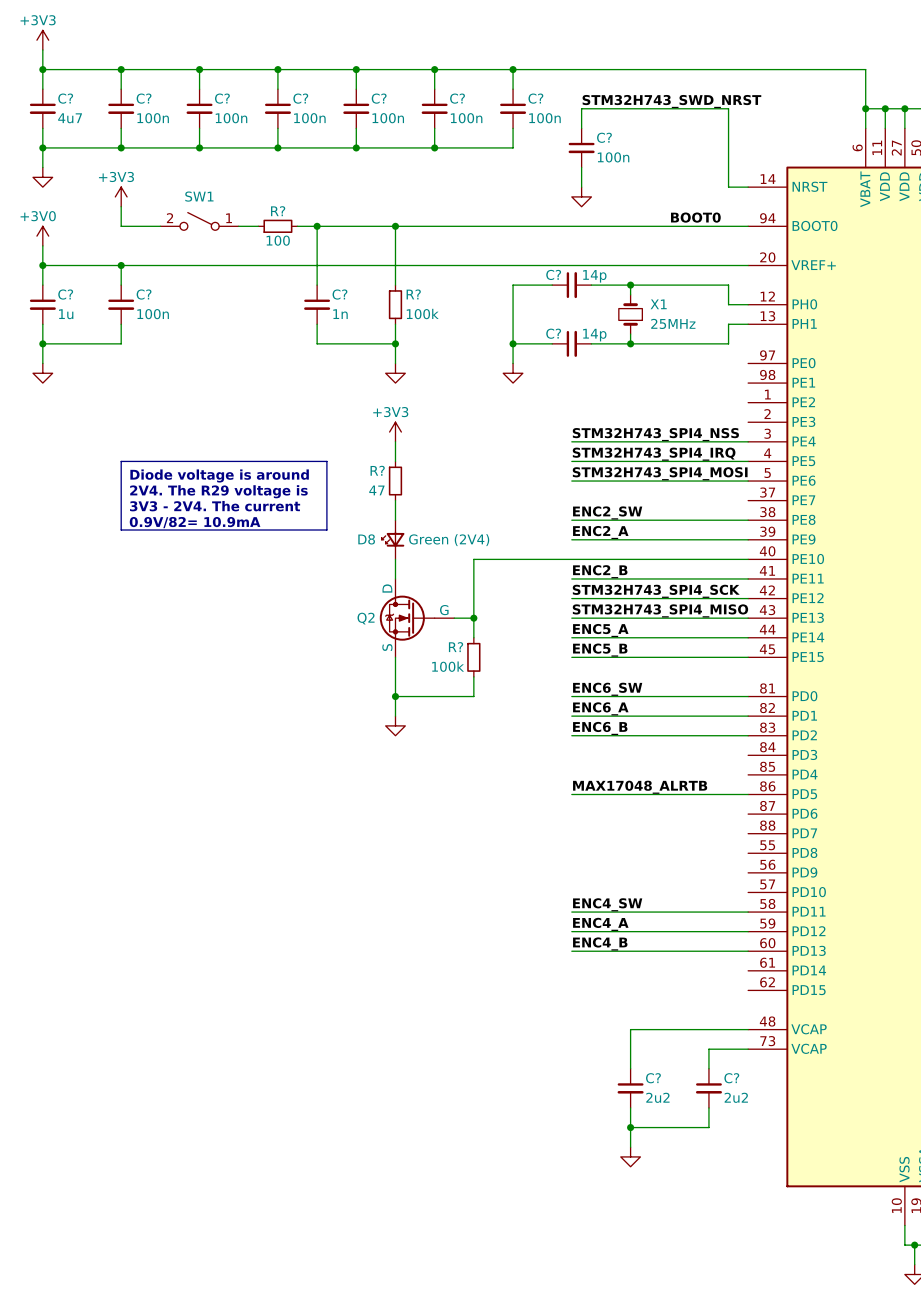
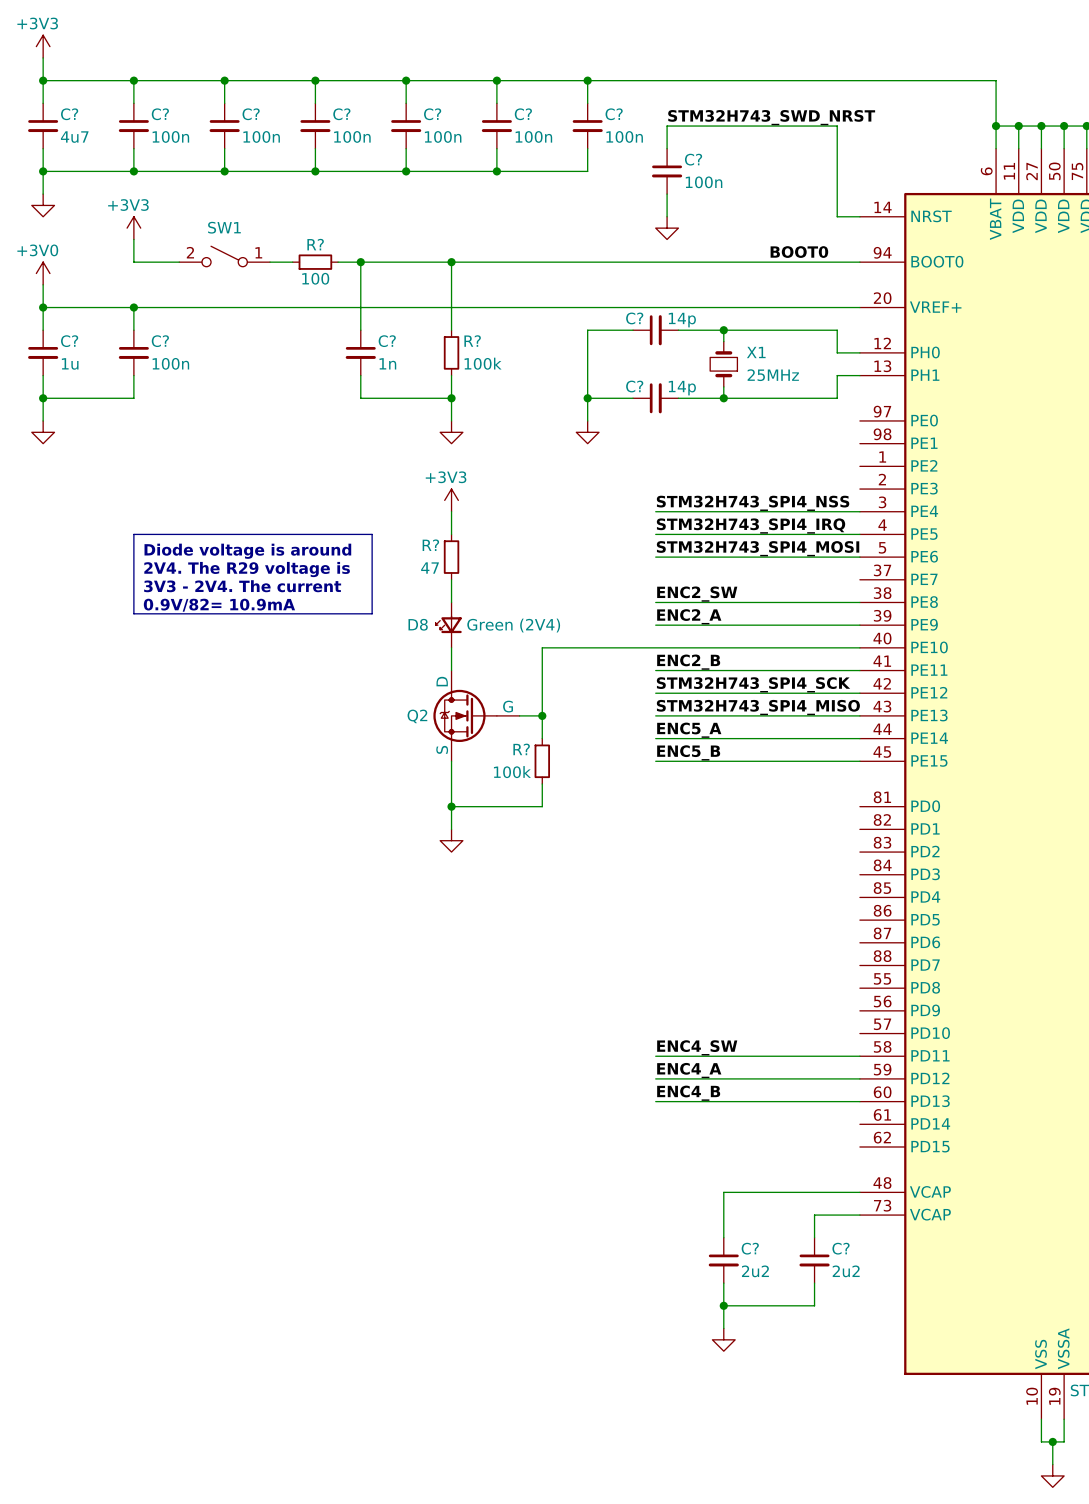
label: ENC6_SW (607, 689) -> none
wire: (571, 696) (748, 696) -> none
label: ENC6_A (600, 708) -> none
wire: (571, 716) (748, 716) -> none
label: ENC6_B (600, 728) -> none
wire: (571, 735) (748, 735) -> none
label: MAX17048_ALRTB (640, 787) -> none
wire: (571, 794) (748, 794) -> none

